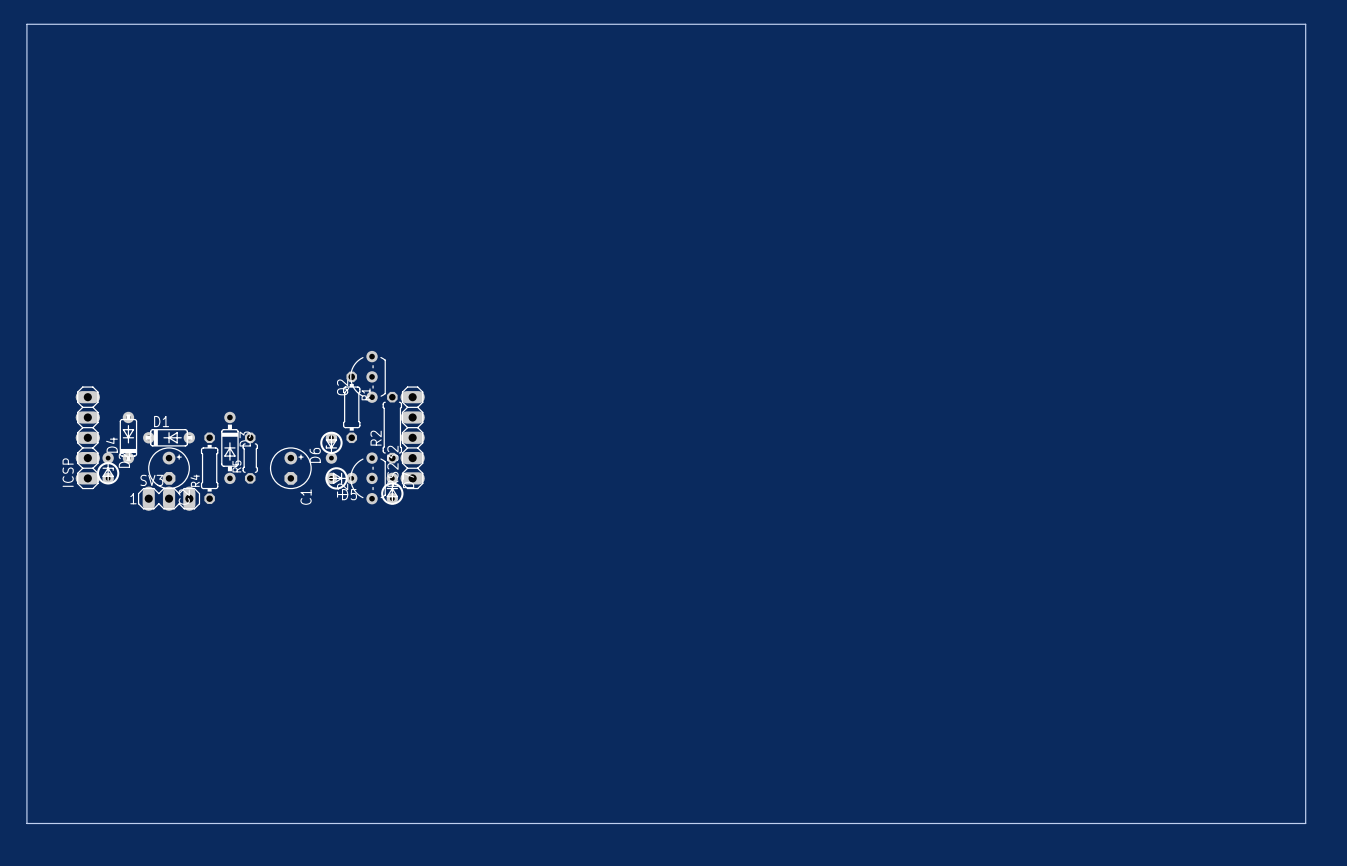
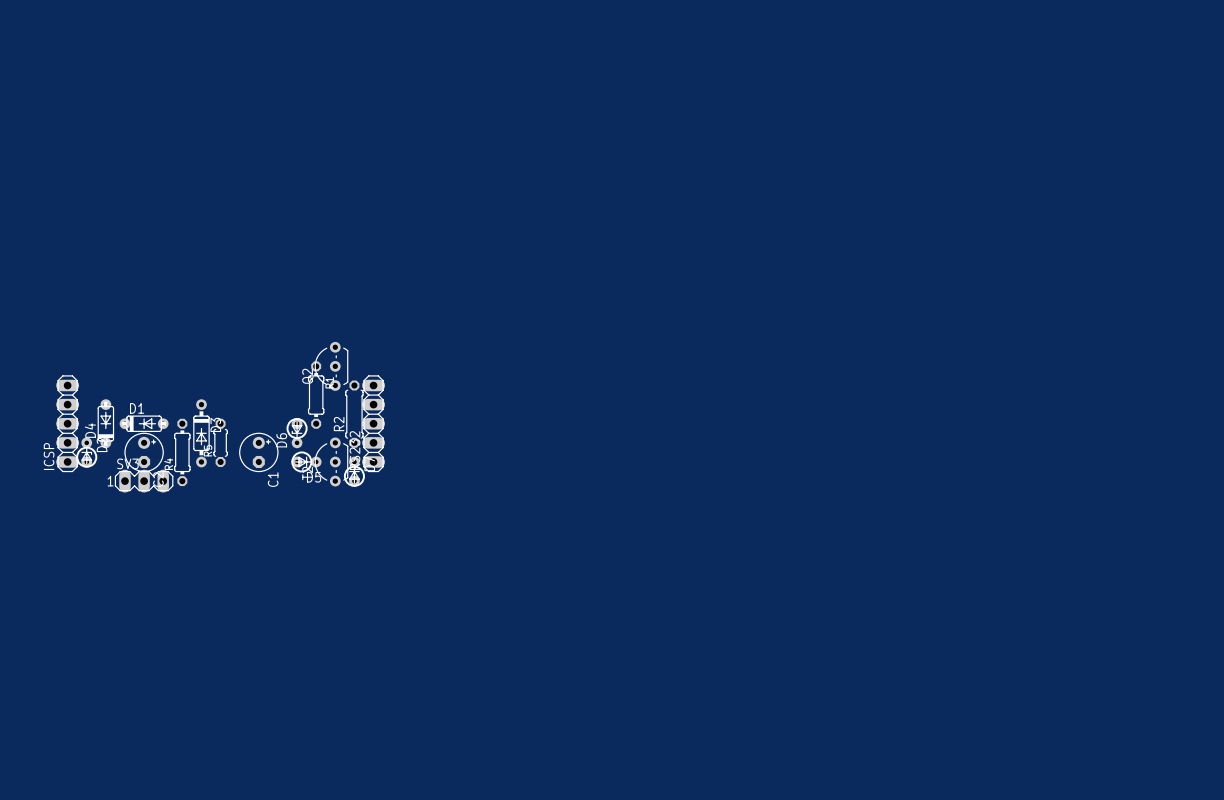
board edge: (26, 24) (1305, 24) (1305, 823) (26, 823) (26, 24) -> none

